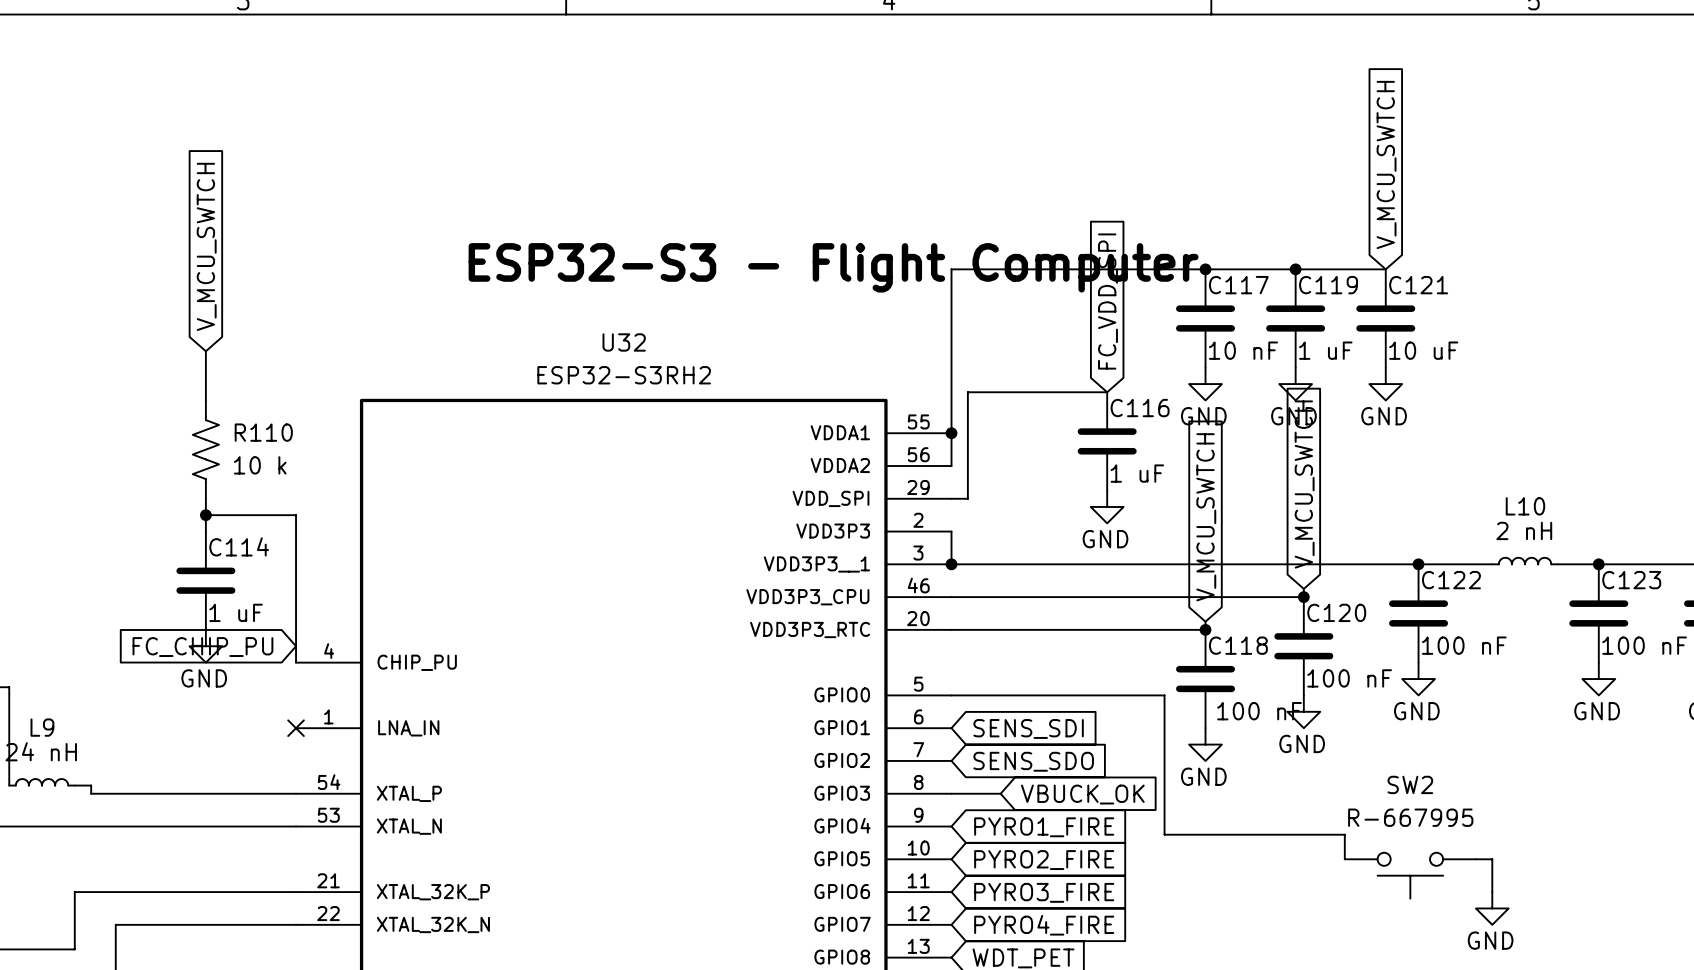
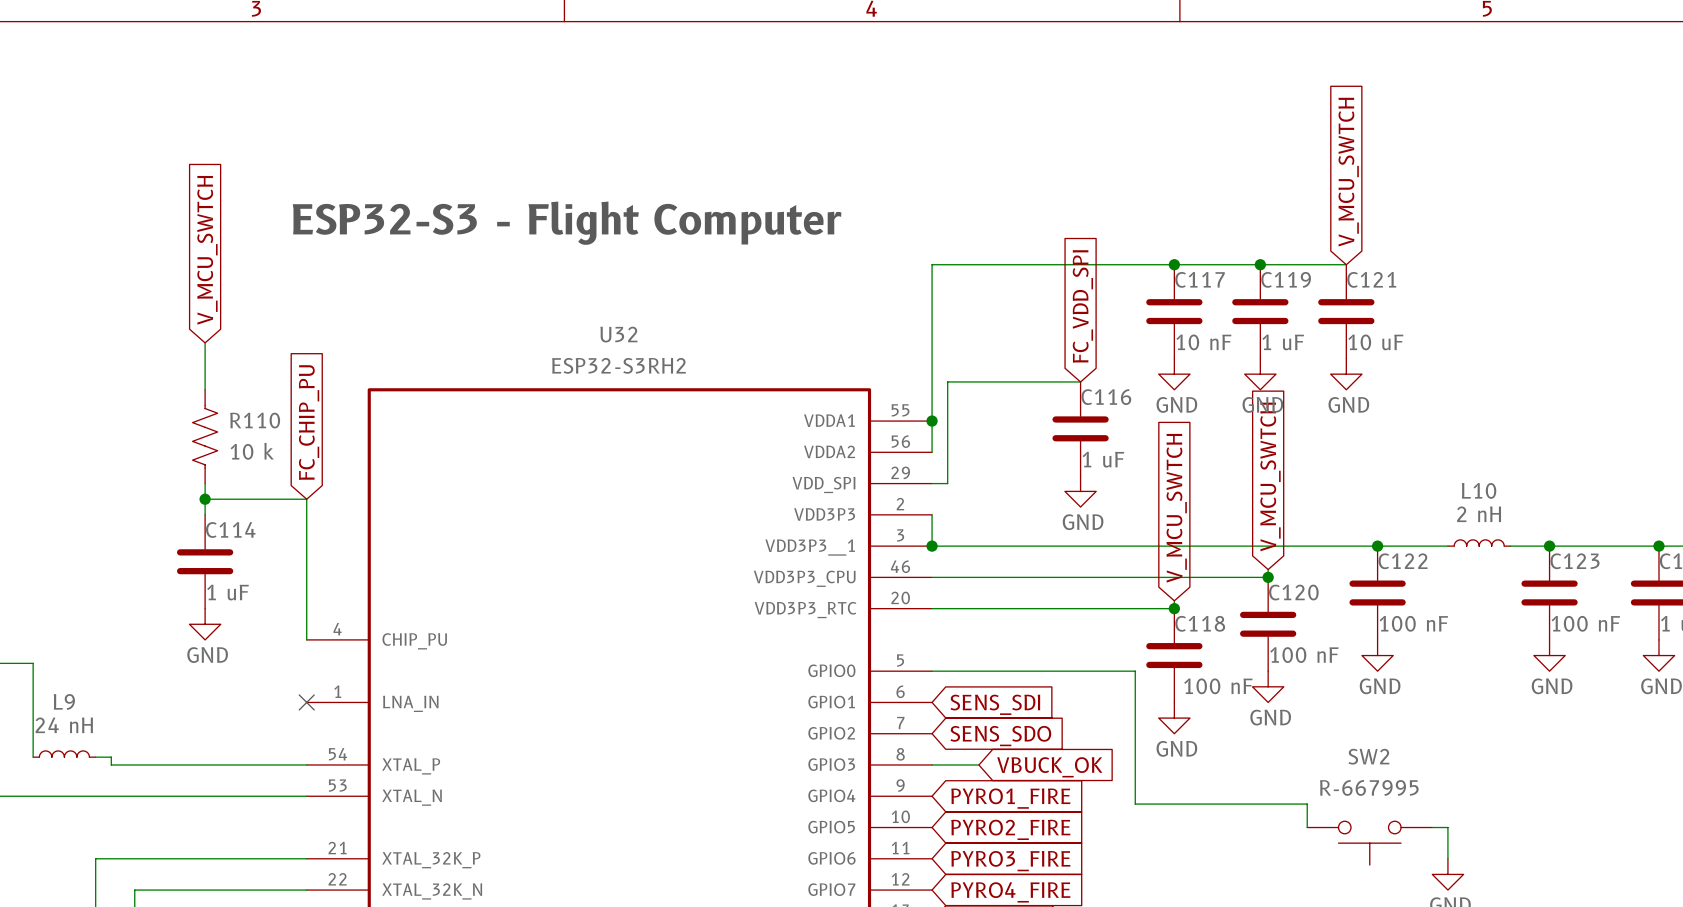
global label position: V_MCU_SWTCH (206, 246) -> V_MCU_SWTCH (207, 250)
text position: ESP32-S3 - Flight Computer (833, 267) -> ESP32-S3 - Flight Computer (567, 223)
wire: (205, 351) (205, 400) -> (205, 342) (205, 389)
R110 position: (205, 449) -> (205, 436)
wire: (205, 498) (205, 531) -> (205, 483) (205, 514)
wire: none -> (205, 499) (220, 499)
junction position: (205, 515) -> (205, 499)
C114 position: (205, 580) -> (205, 561)
power symbol position: GND (205, 646) -> GND (205, 624)
global label rotation: 0° (202, 647) -> 90° clockwise (309, 422)
global label position: FC_CHIP_PU (202, 647) -> FC_CHIP_PU (309, 422)

